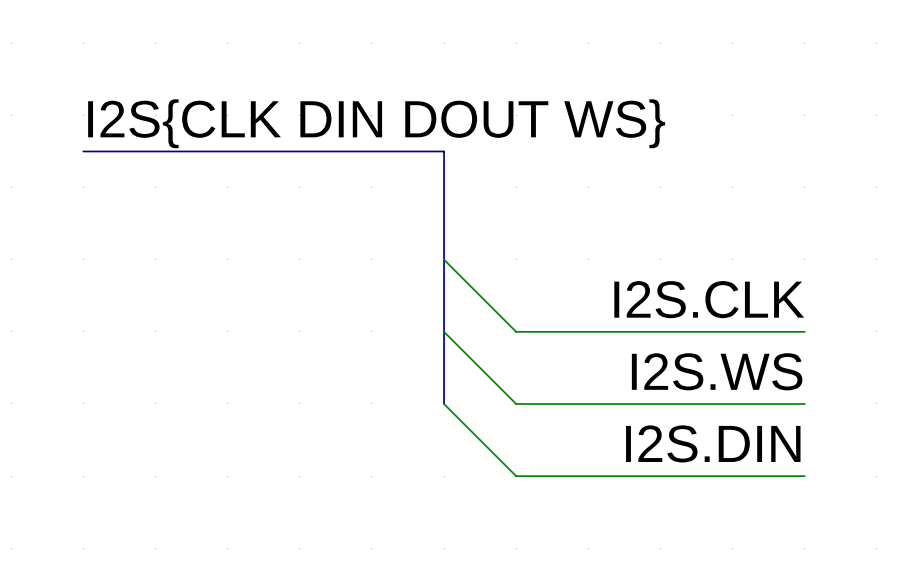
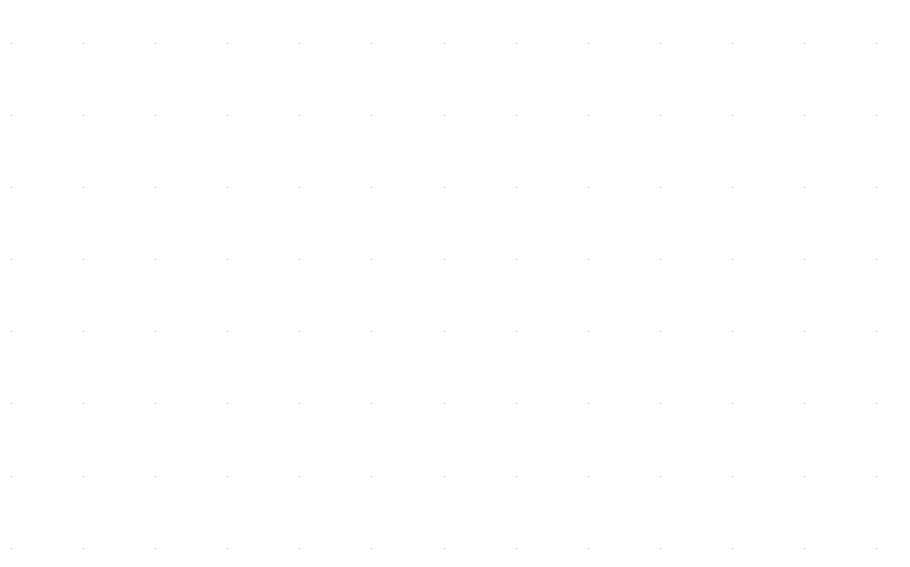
label: I2S{CLK DIN DOUT WS} (376, 123) -> none
bus: (83, 151) (444, 151) (444, 403) -> none
wire: (444, 259) (516, 331) (804, 331) -> none
label: I2S.CLK (709, 299) -> none
wire: (444, 331) (516, 403) (804, 403) -> none
label: I2S.WS (717, 371) -> none
wire: (444, 403) (516, 476) (804, 476) -> none
label: I2S.DIN (713, 443) -> none

